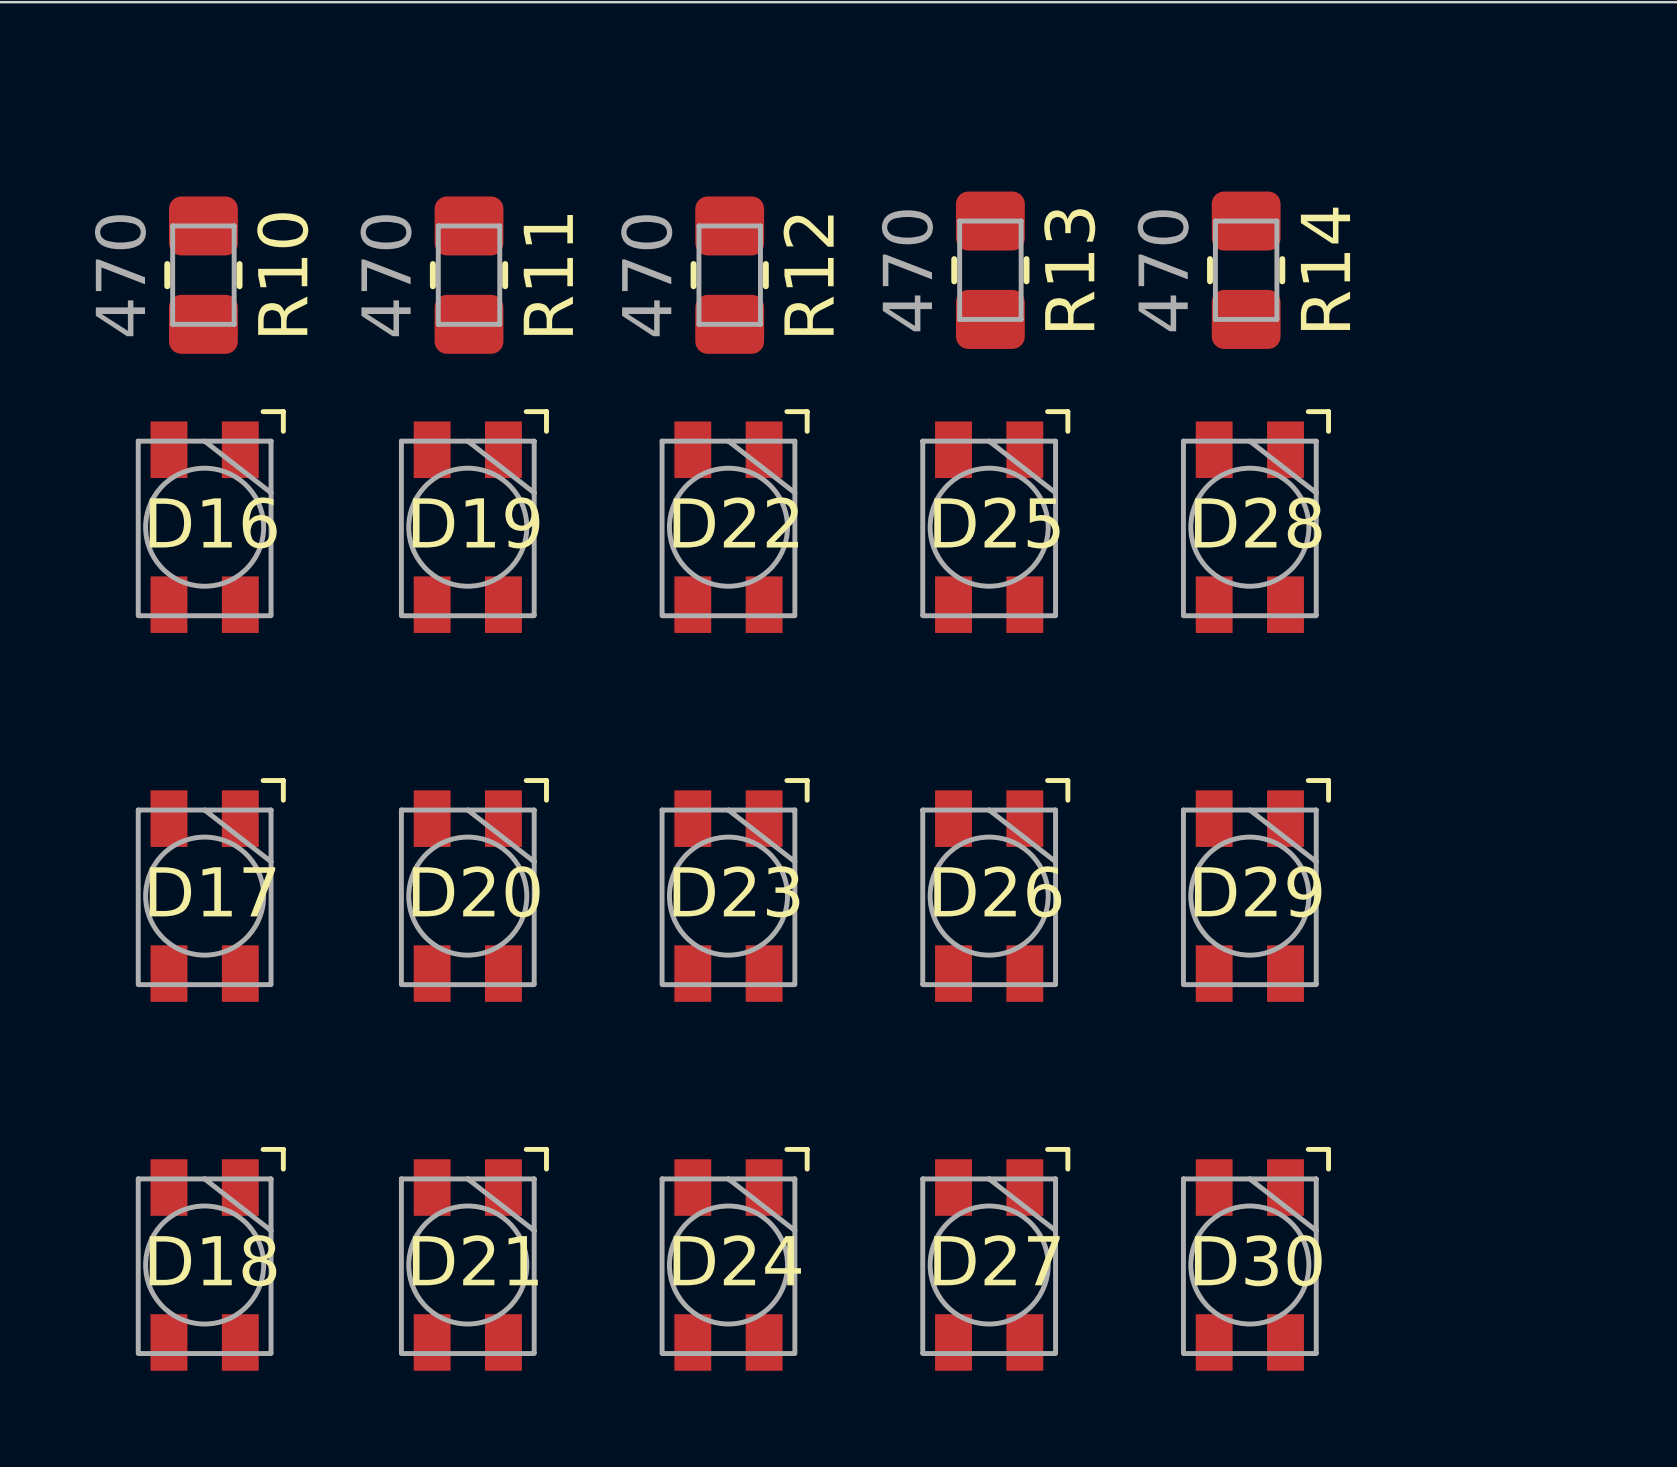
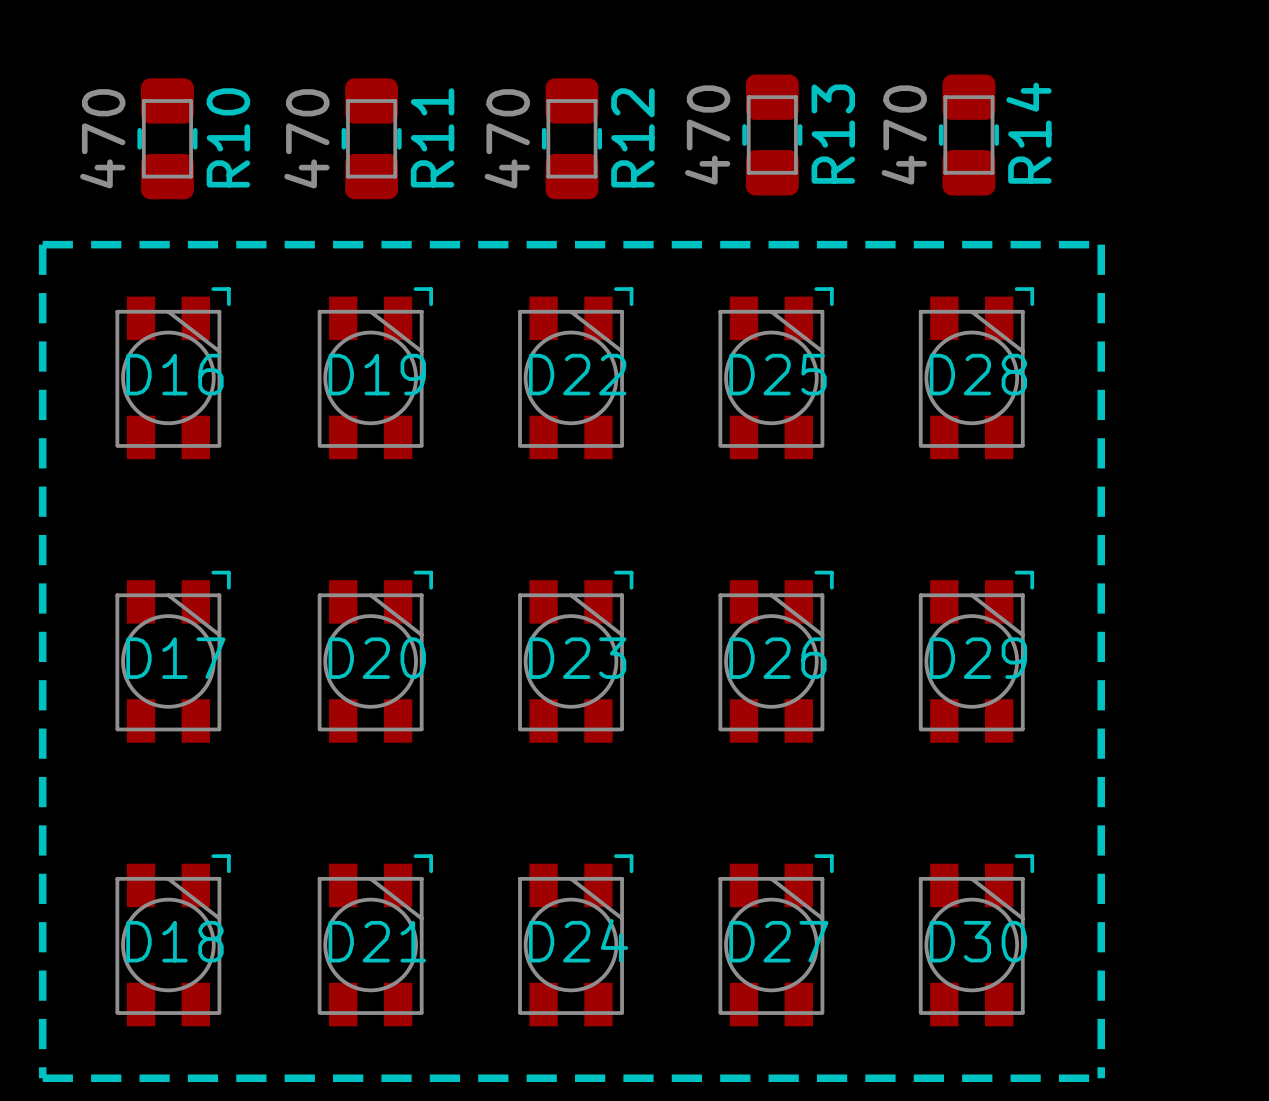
R13 position: (990, 270) -> (772, 135)
R14 position: (1246, 270) -> (968, 135)
R10 position: (203, 275) -> (167, 138)
R11 position: (469, 275) -> (371, 138)
R12 position: (729, 275) -> (571, 138)
line: none -> (42, 244) (1101, 244) (1101, 1078) (42, 1078) (42, 244)

